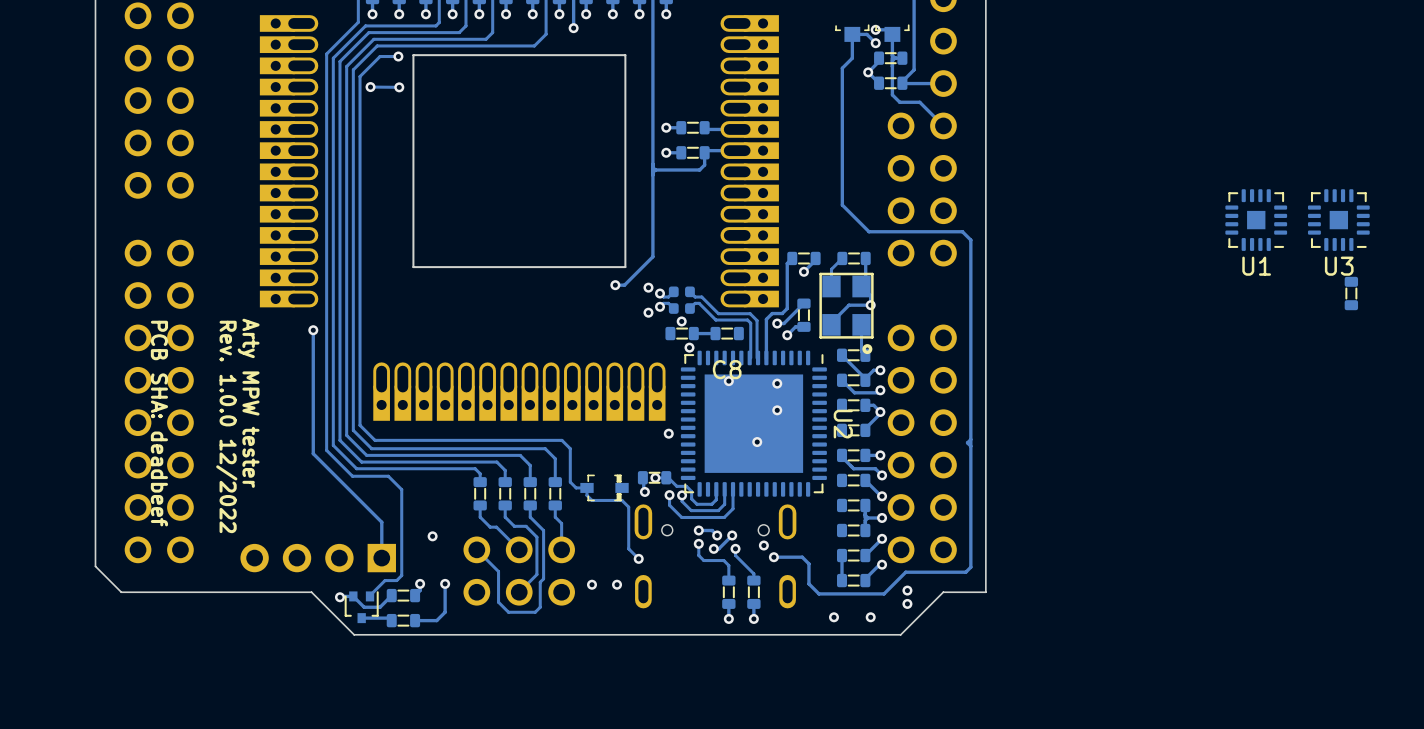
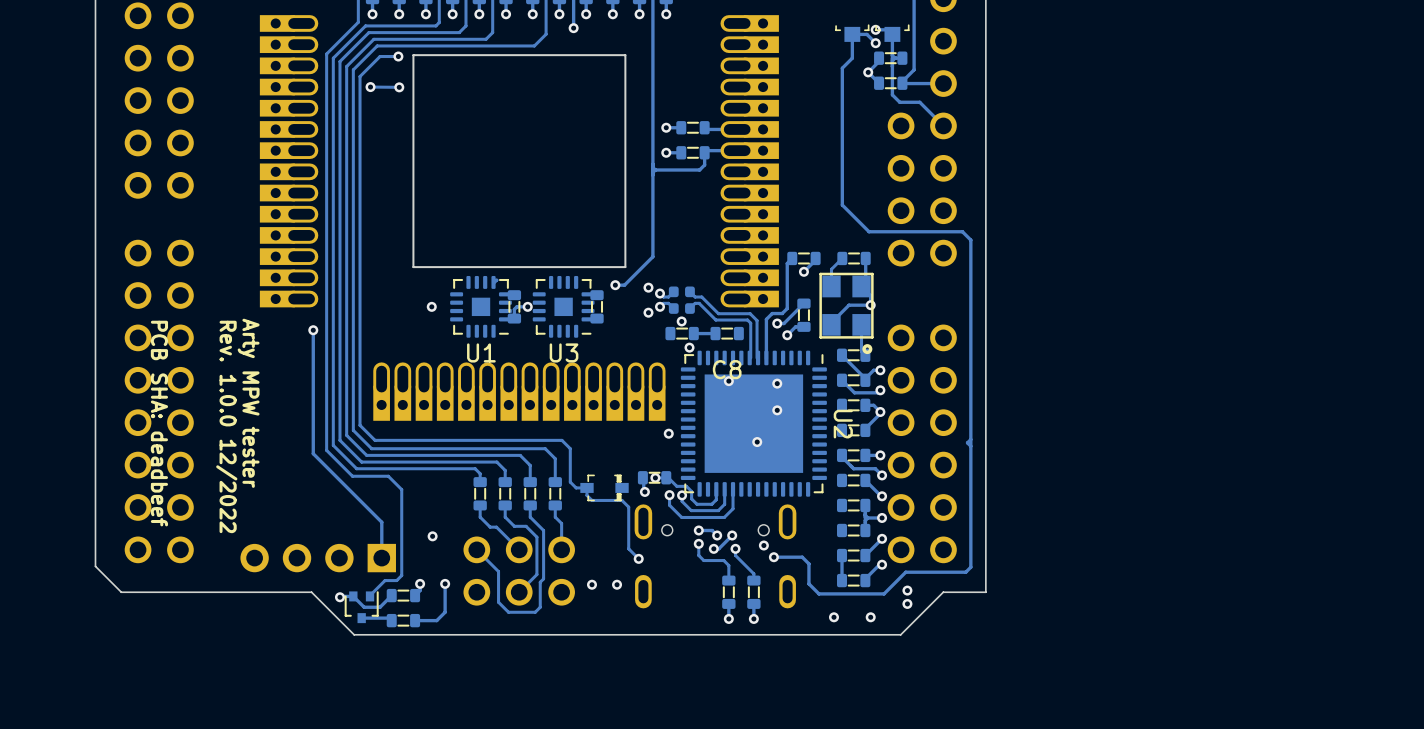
U1 position: (1256, 220) -> (481, 306)
U3 position: (1338, 220) -> (563, 306)
track: none -> (493, 280) (496, 280) (493, 283)
part: (1351, 293) -> none
via: none -> (431, 306)
part: none -> (514, 306)
track: none -> (527, 306) (516, 306) (514, 309) (514, 318)
via: none -> (527, 306)
part: none -> (597, 306)

